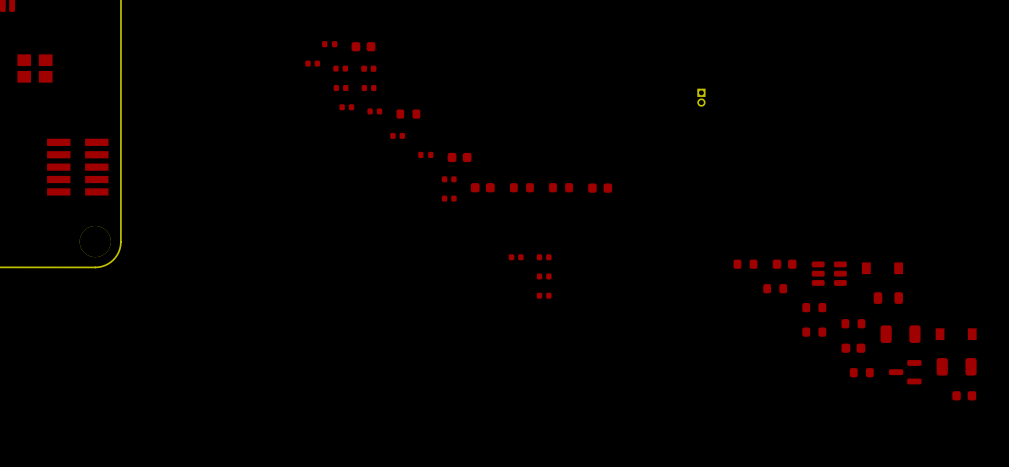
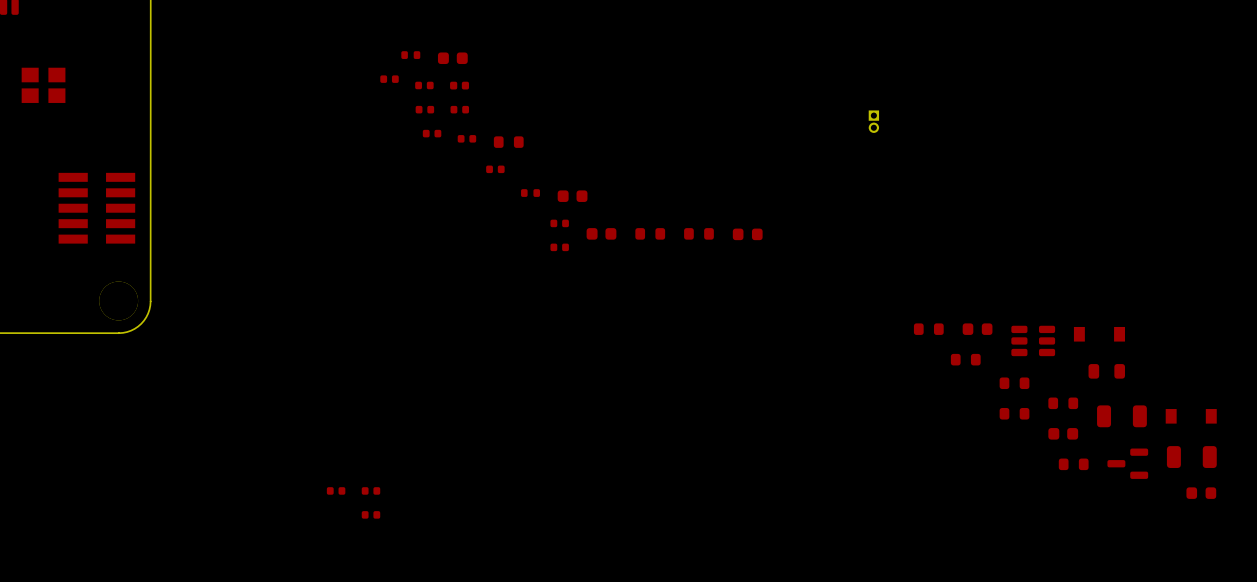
part: (516, 257) -> none
part: (544, 257) -> none
part: (544, 276) -> none
part: (544, 295) -> none
part: none -> (336, 490)
part: none -> (370, 490)
part: none -> (370, 514)

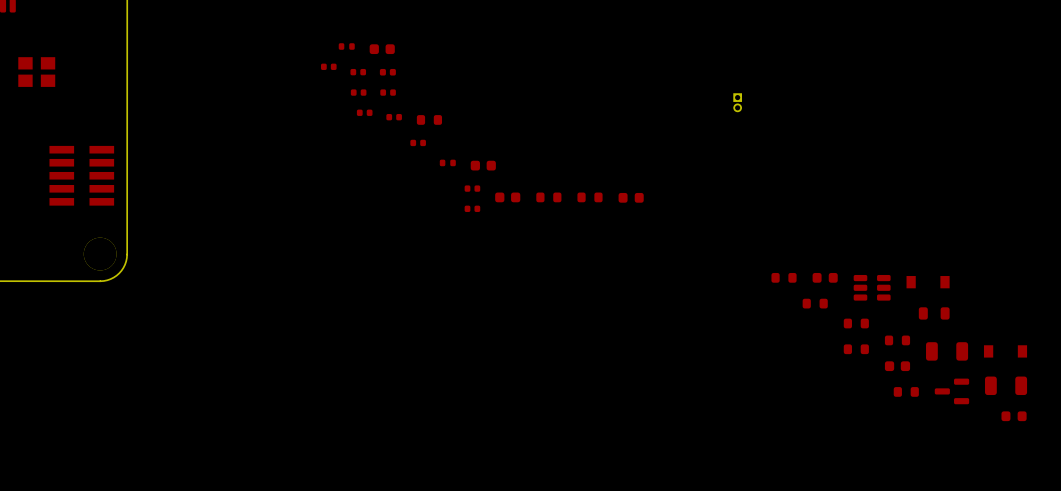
part: (336, 490) -> none
part: (370, 490) -> none
part: (370, 514) -> none

